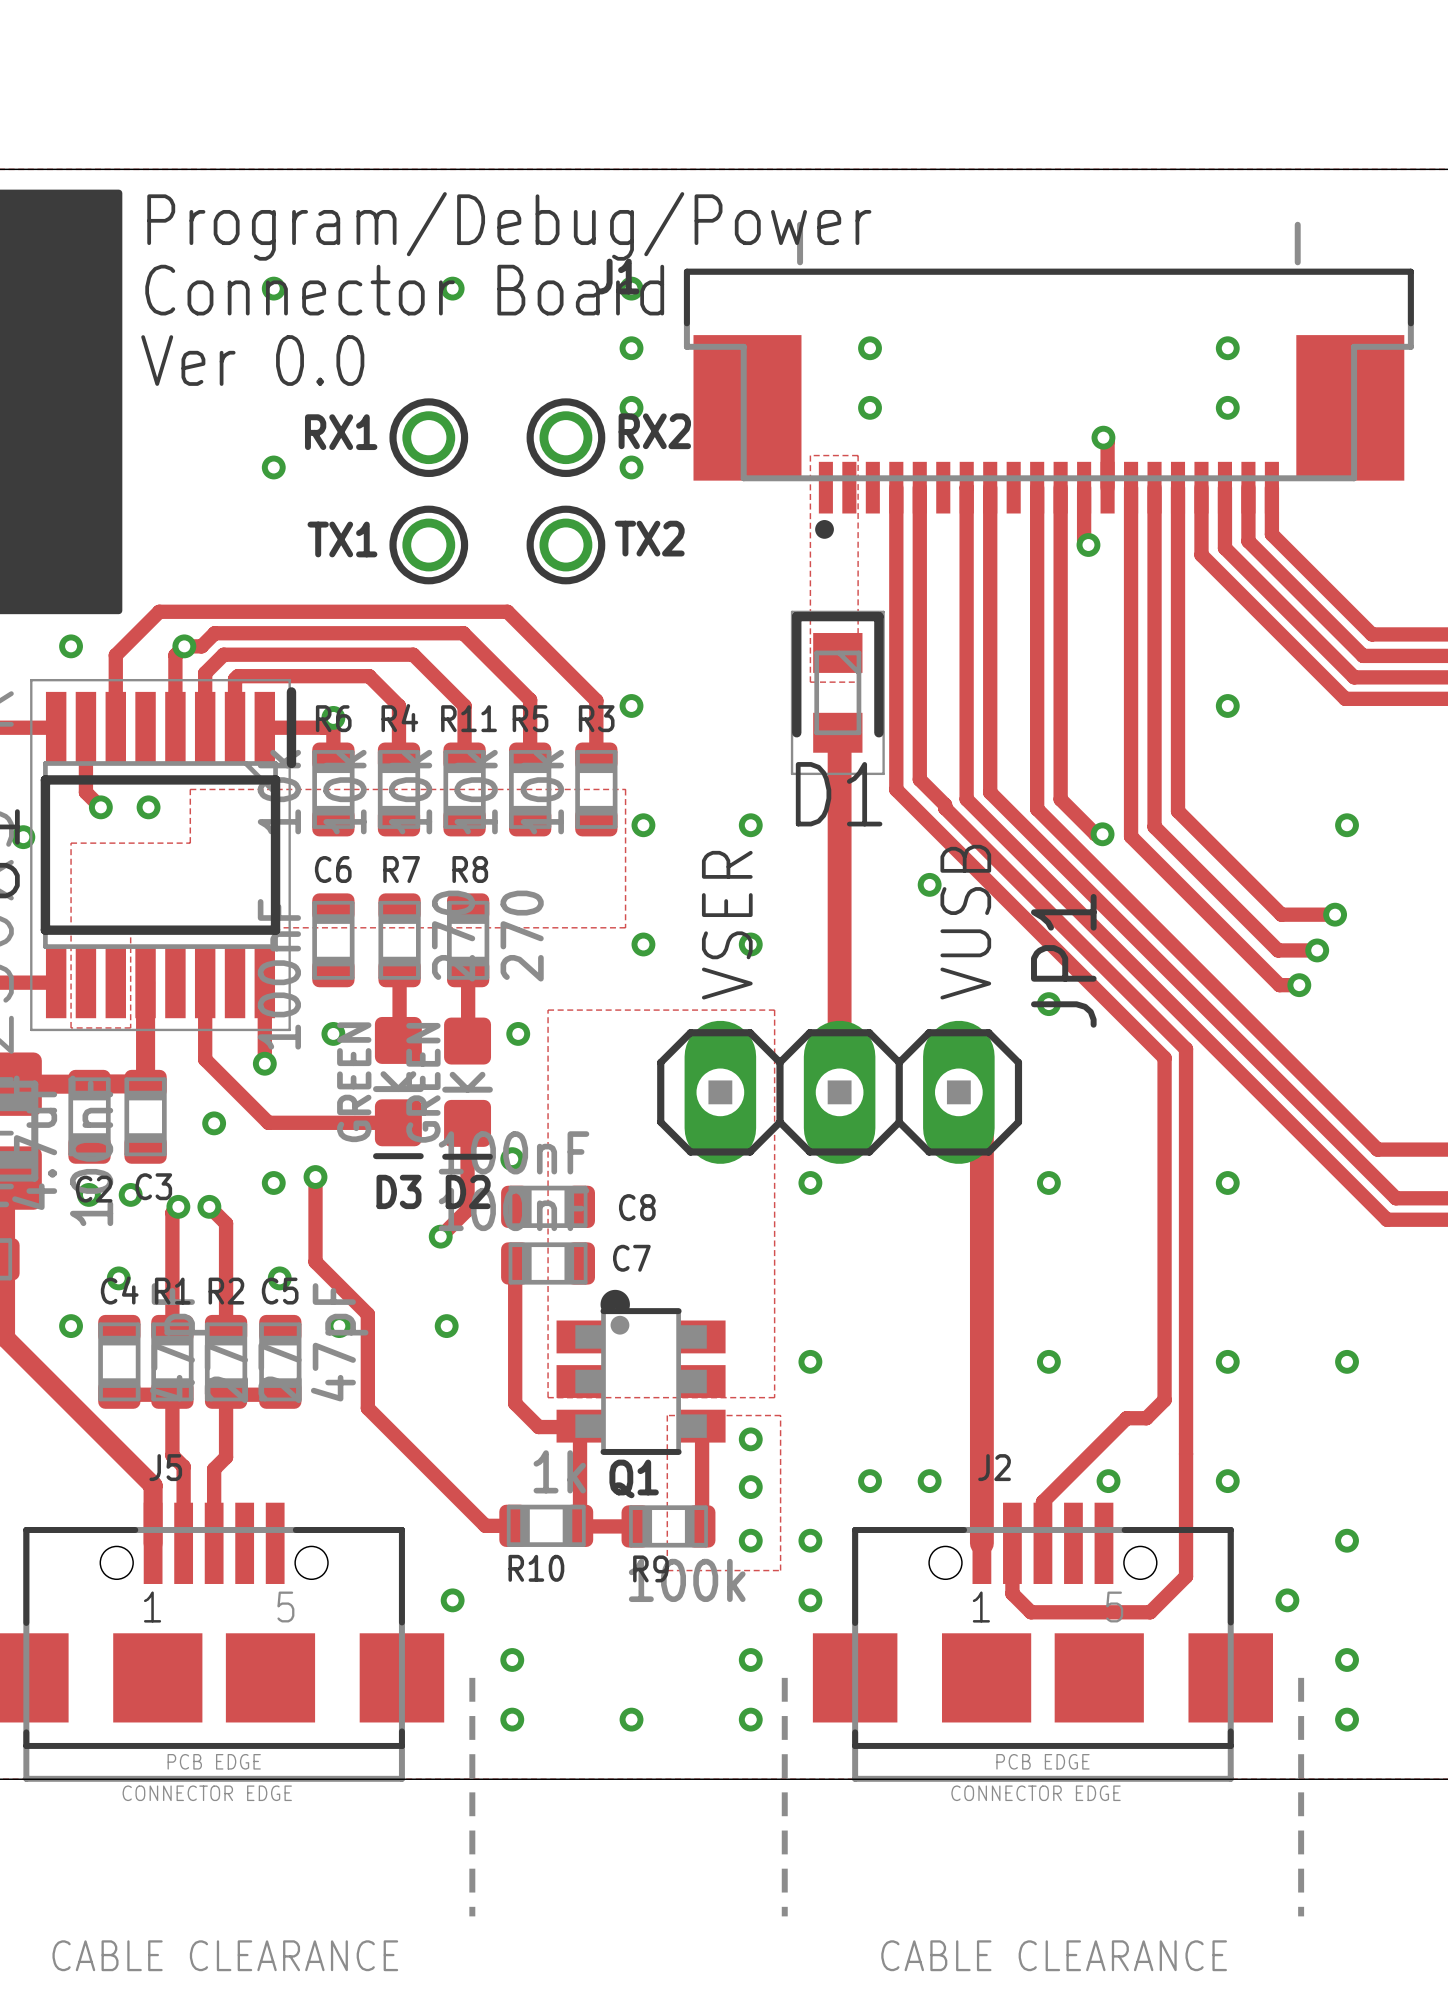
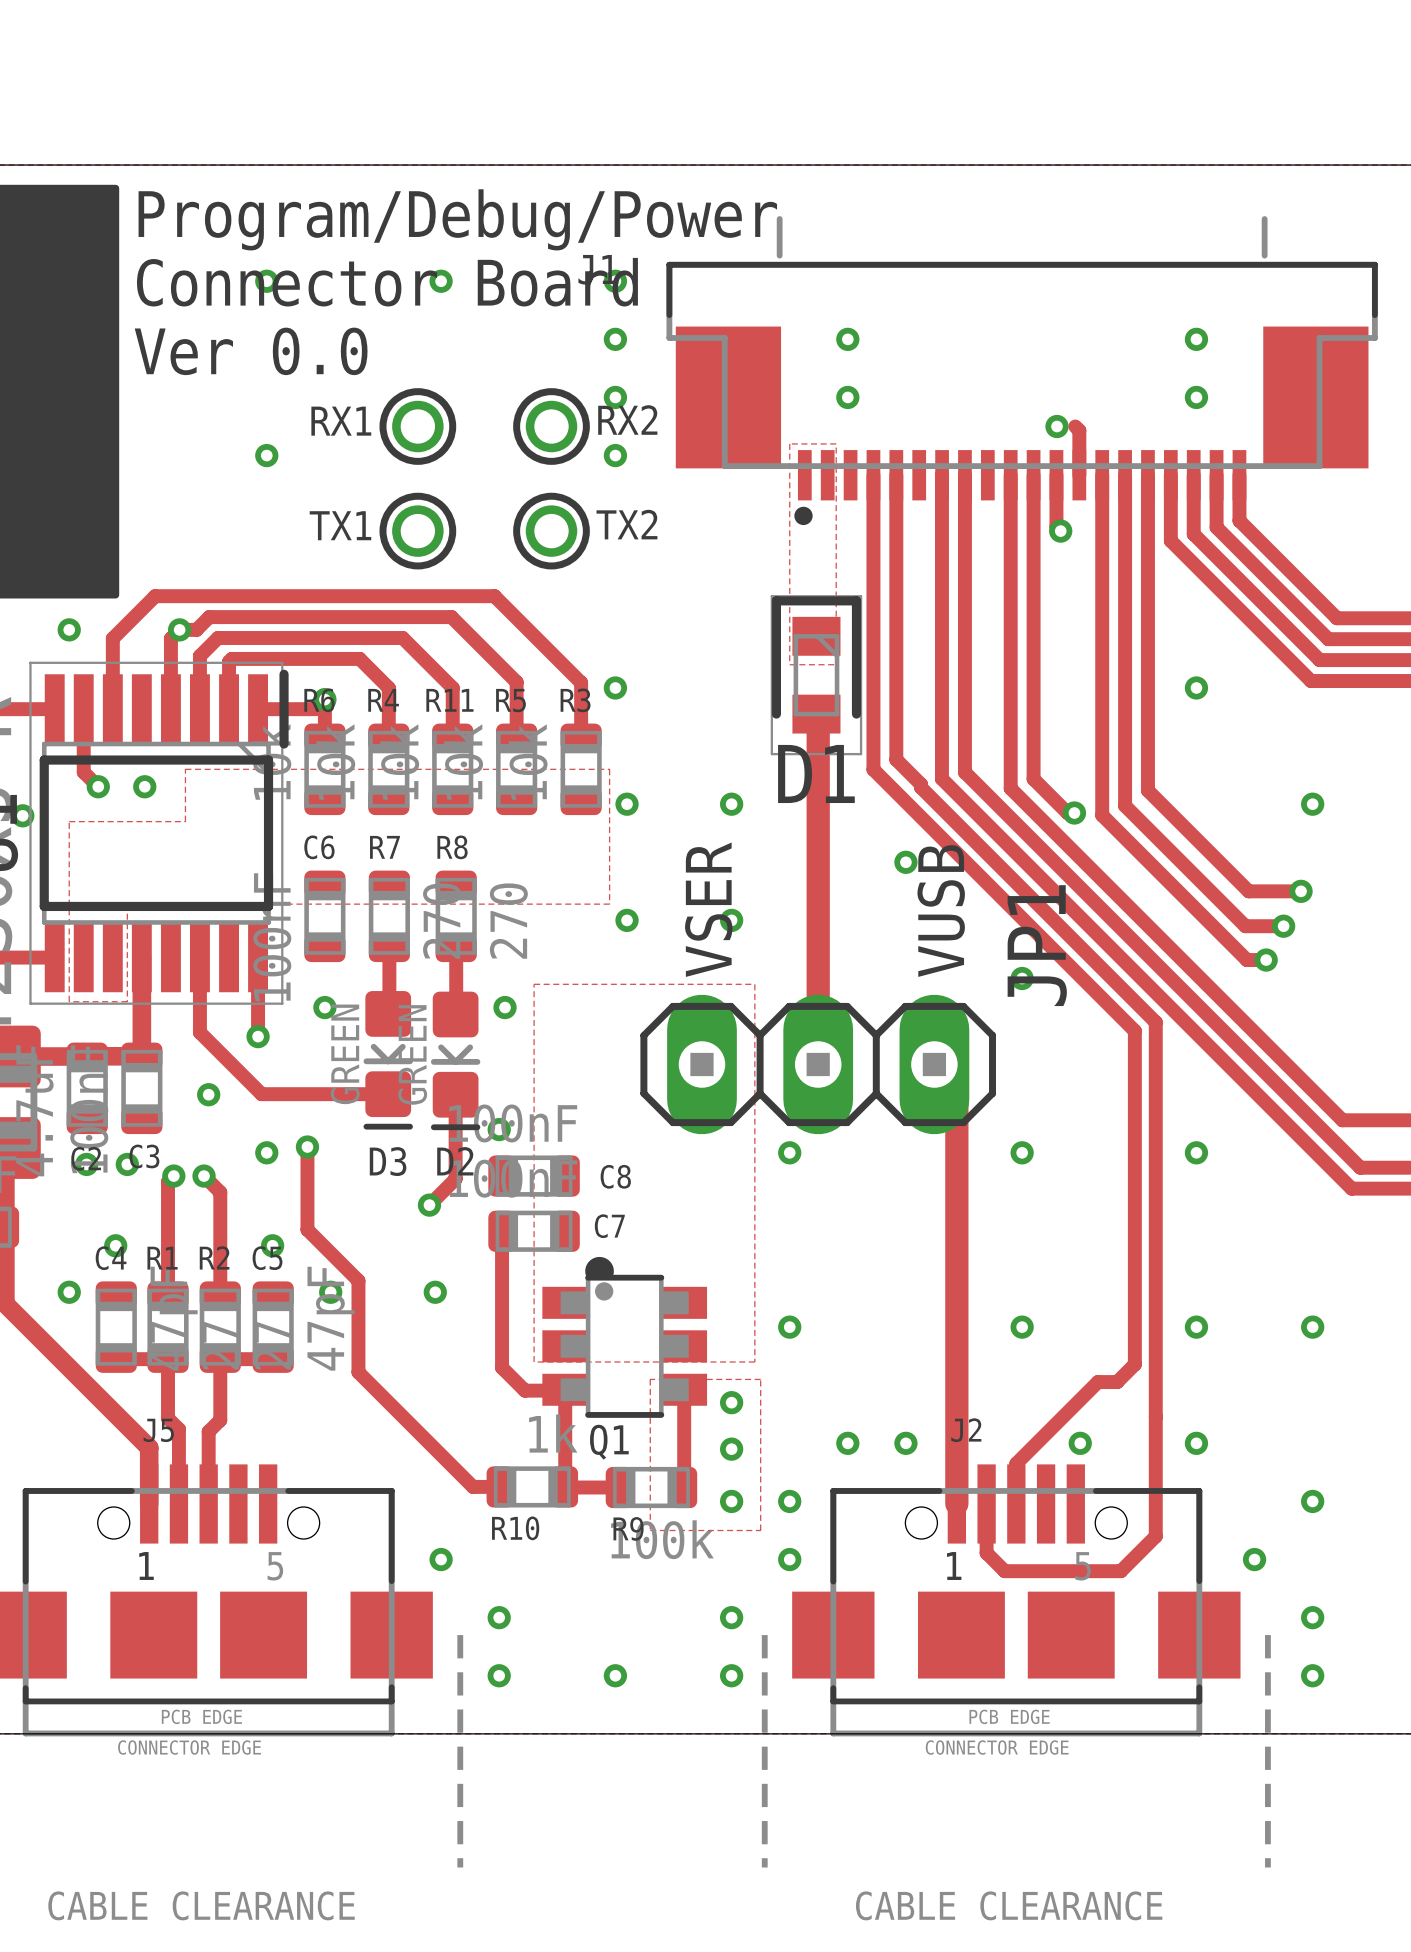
via position: (1103, 437) -> (1057, 426)

